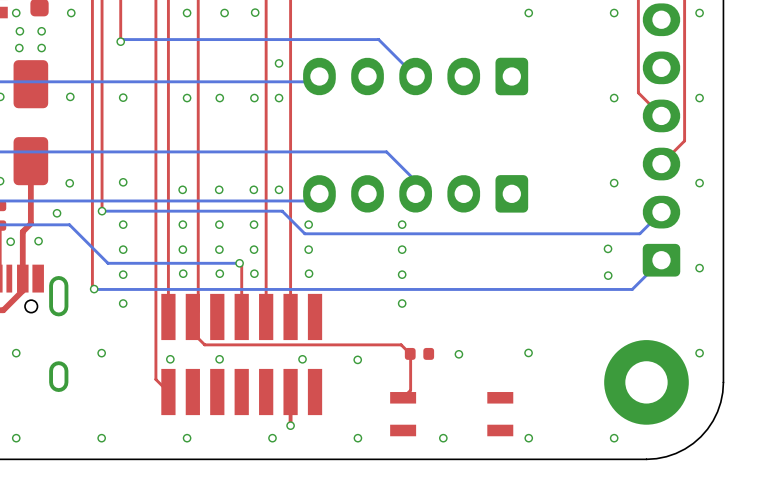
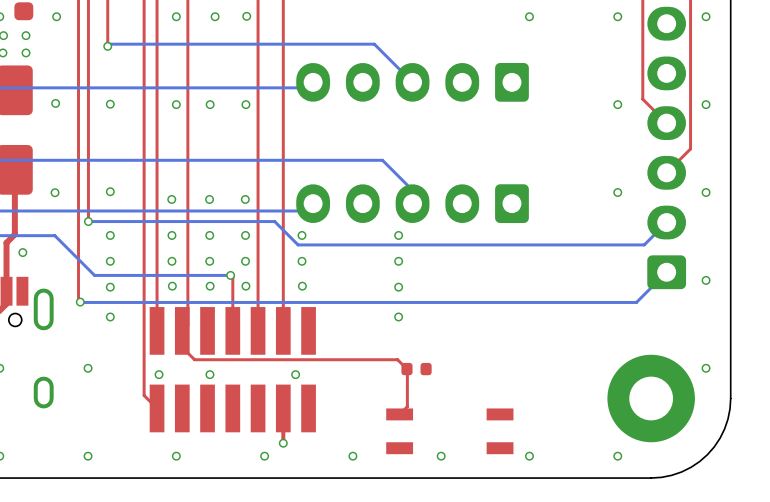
via: (279, 63) -> none
via: (279, 98) -> none
via: (279, 189) -> none
via: (57, 213) -> none
via: (608, 248) -> none
via: (608, 275) -> none
via: (528, 352) -> none
via: (458, 354) -> none
via: (357, 359) -> none

